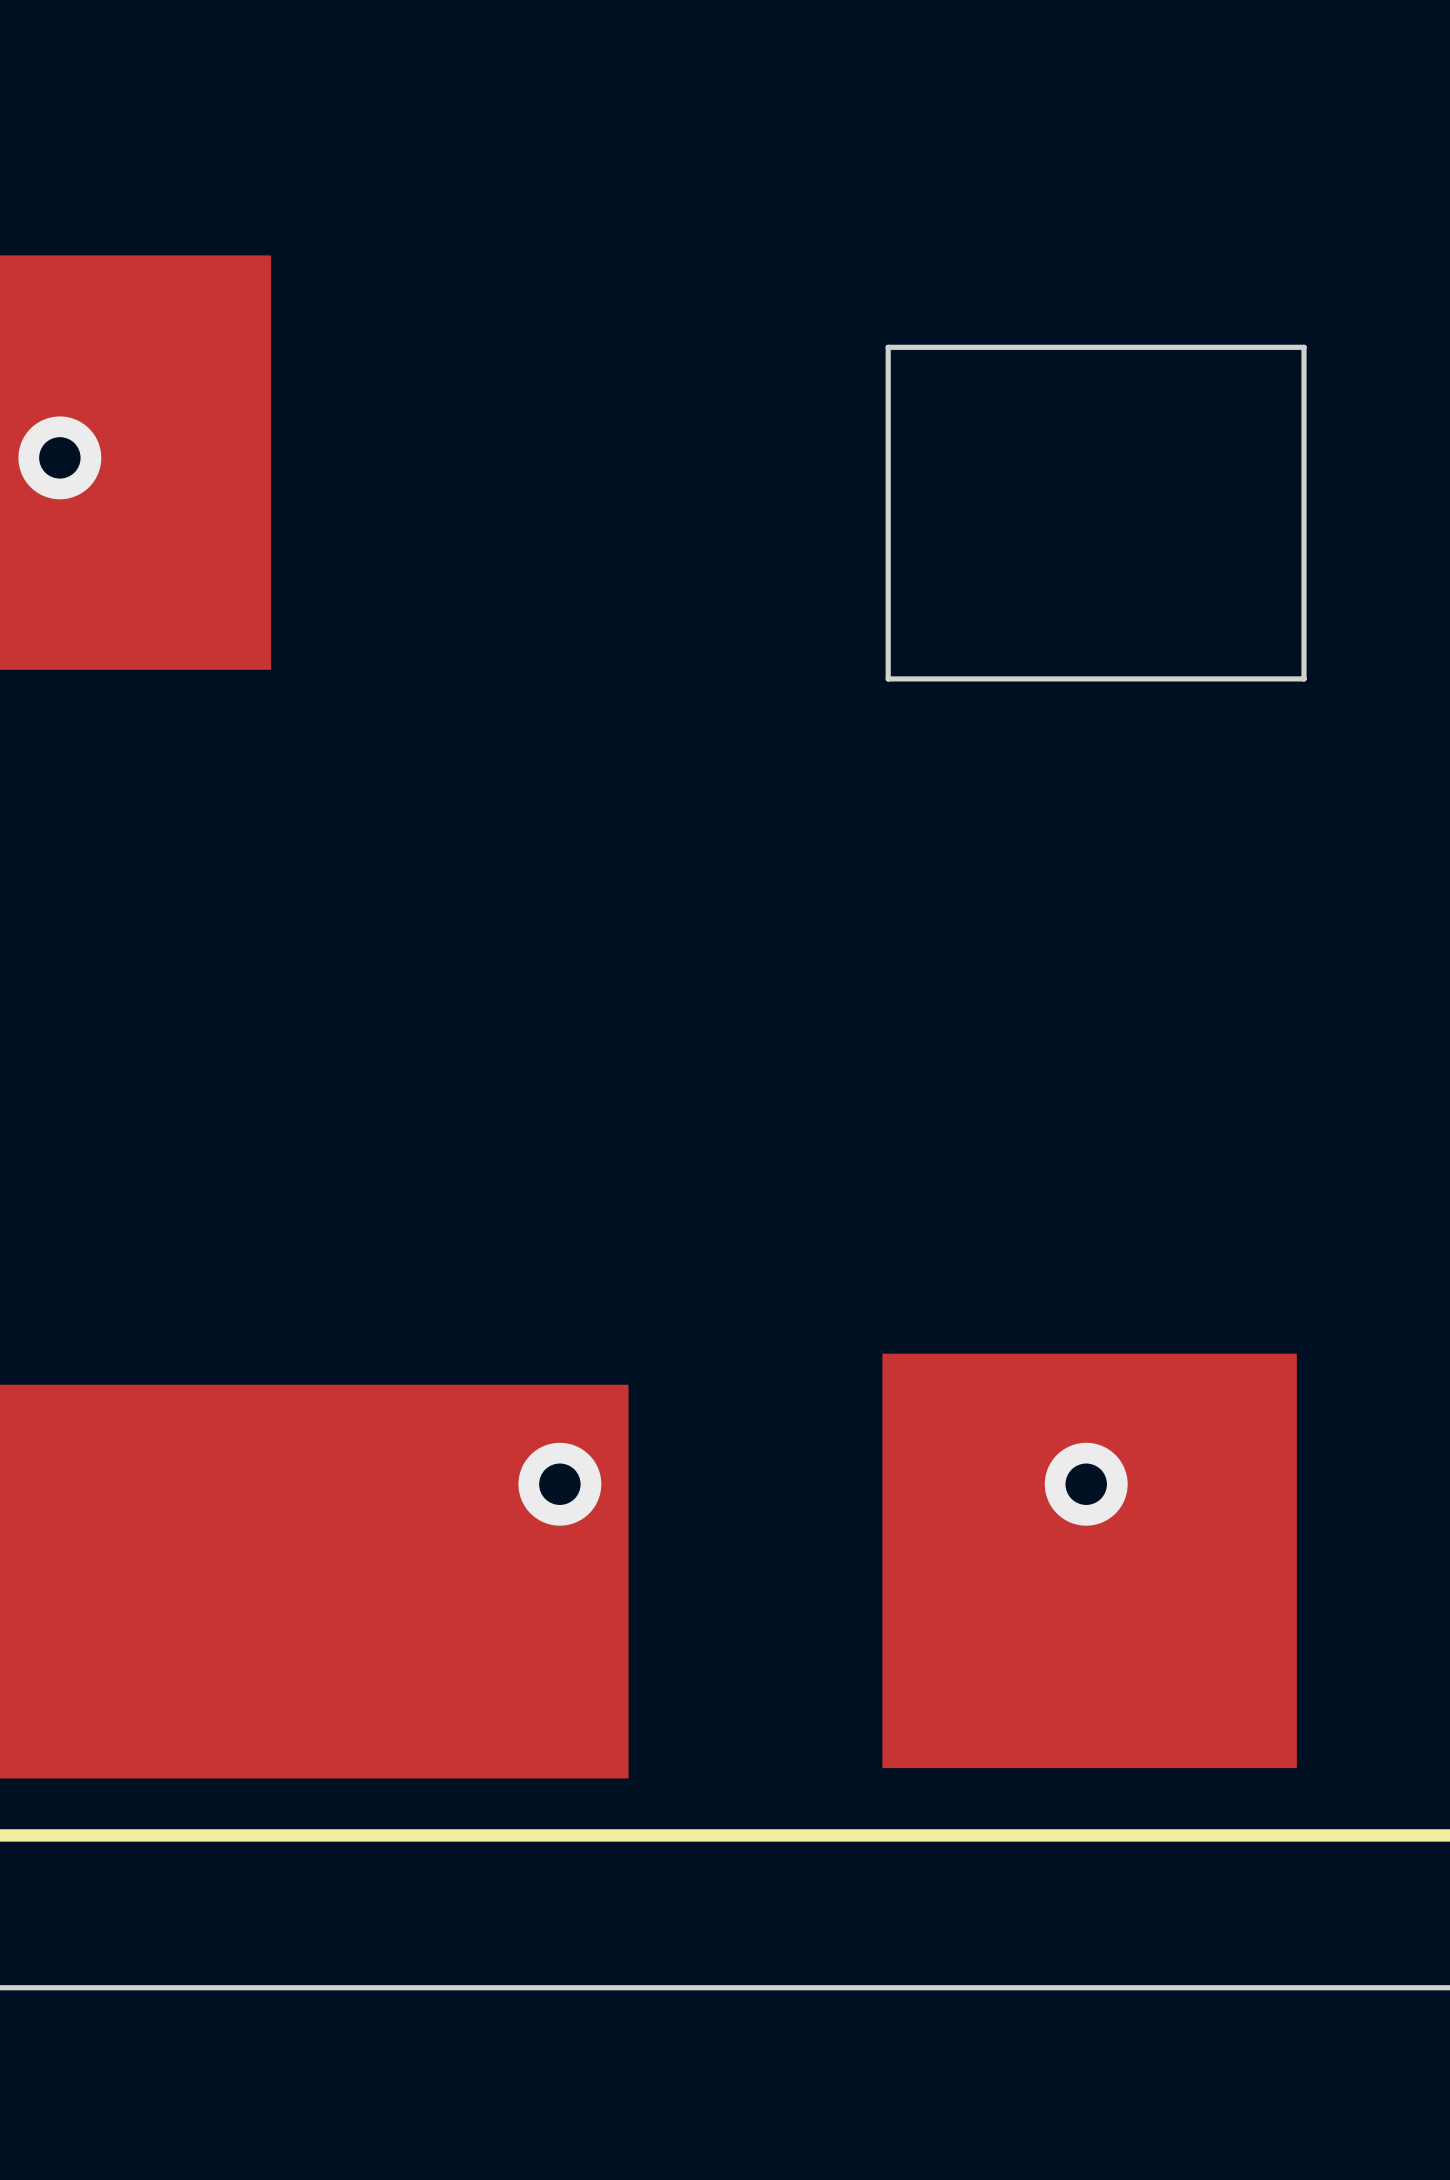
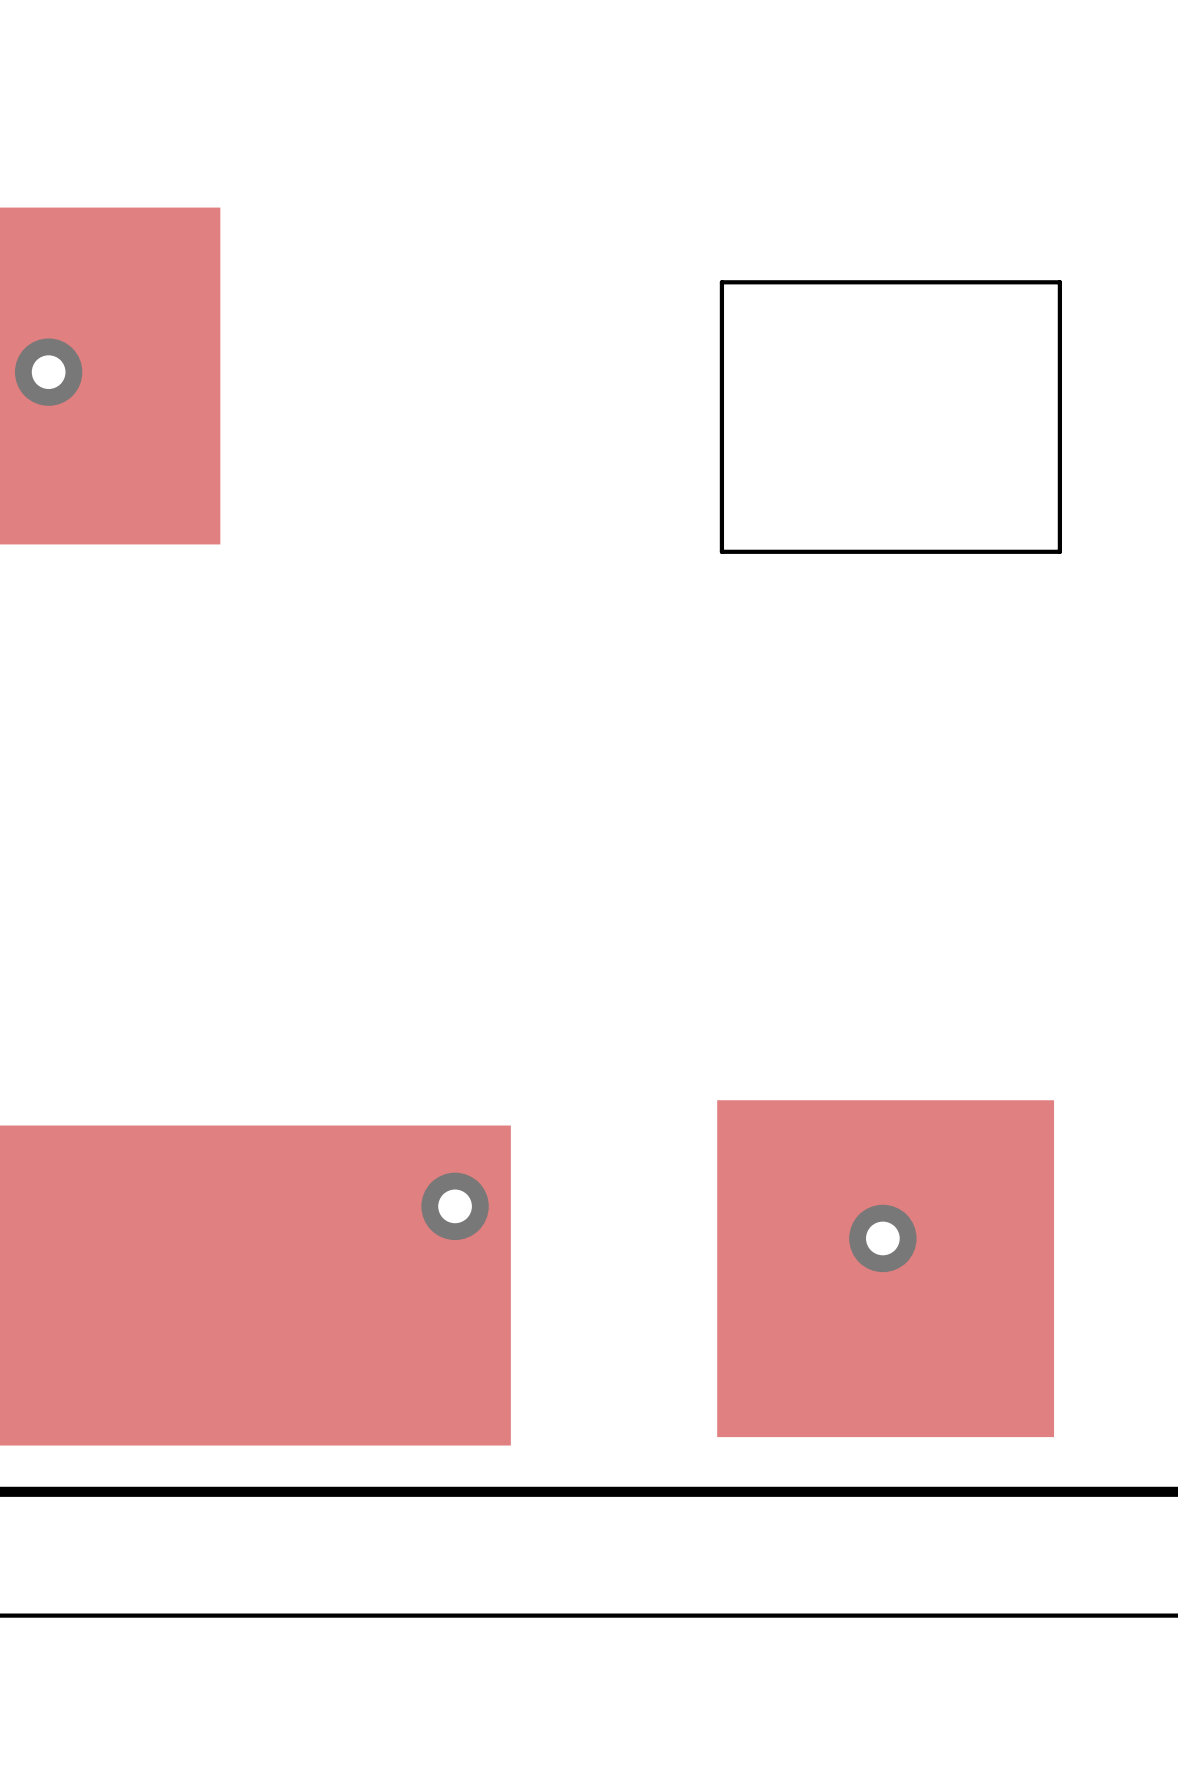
via position: (1086, 1484) -> (882, 1238)

